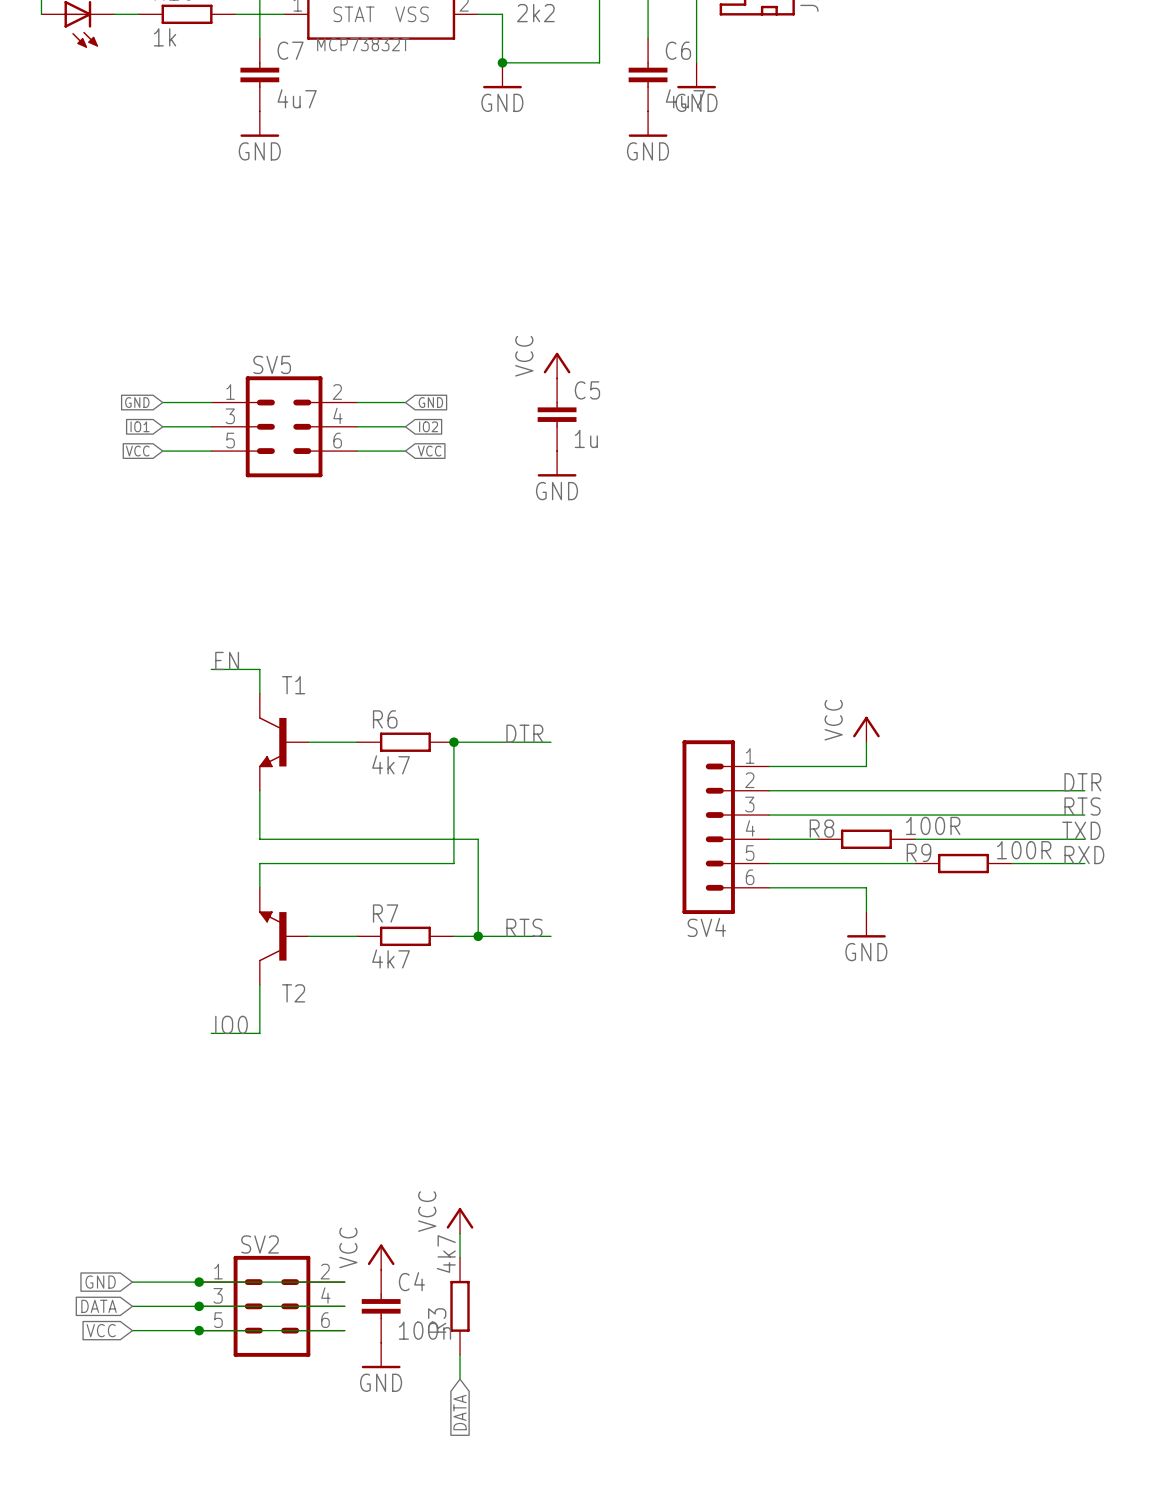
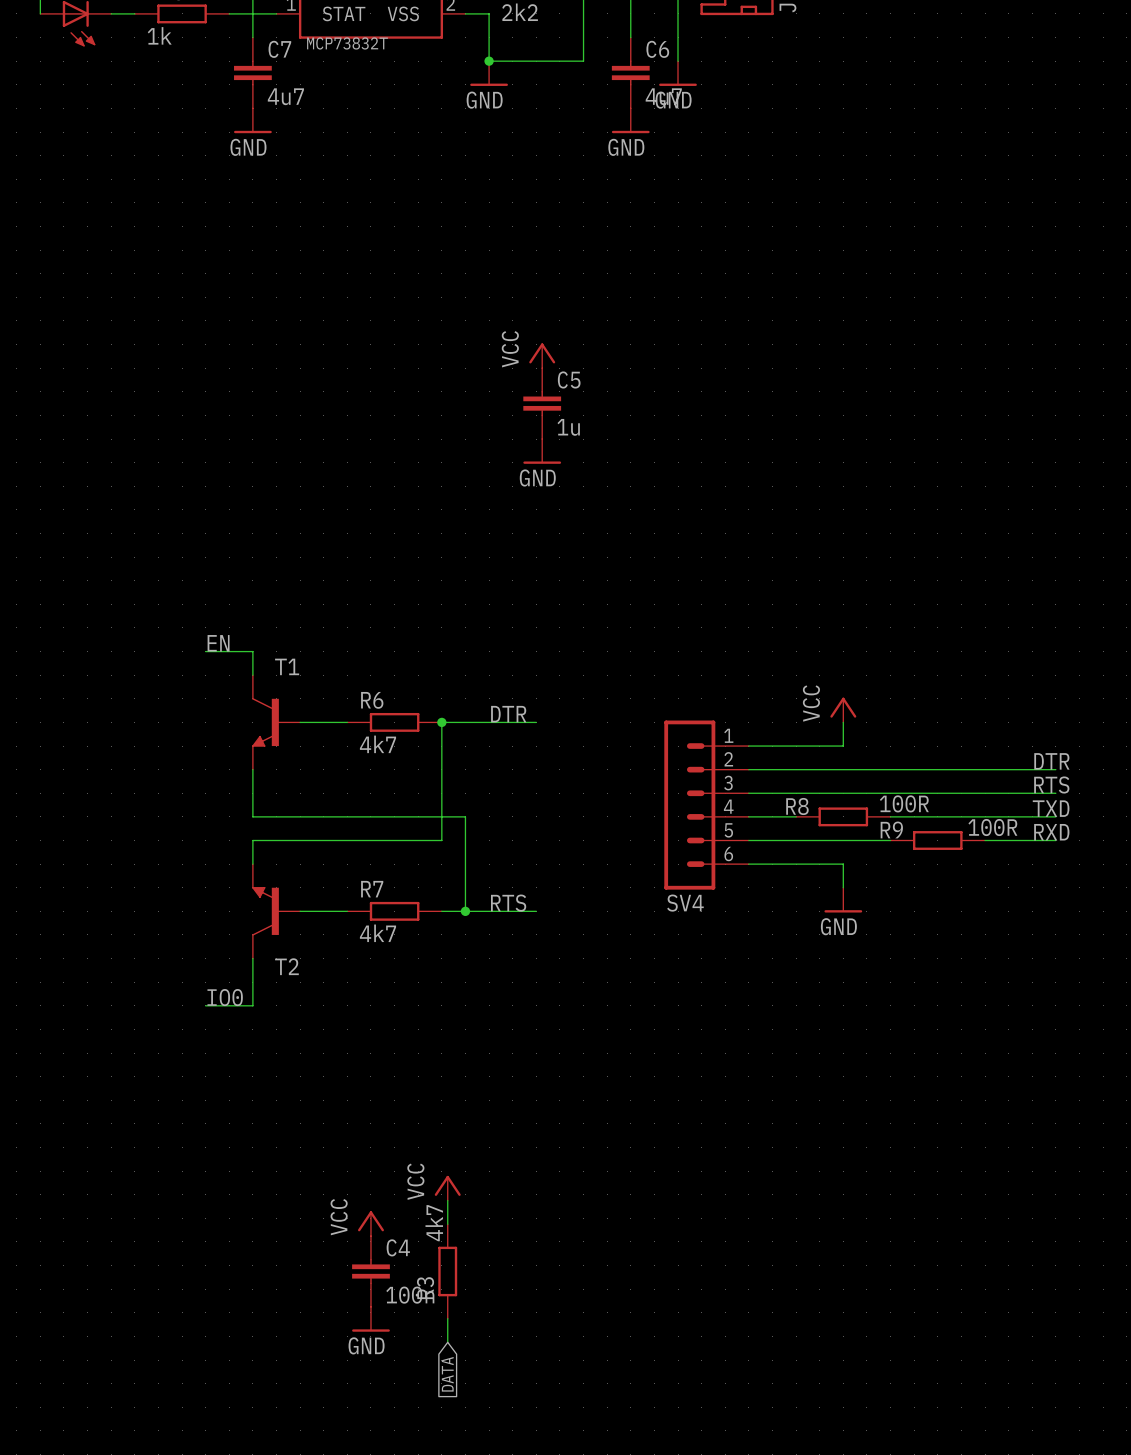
global label: GND (137, 402) -> none
wire: (162, 402) (211, 402) -> none
wire: (356, 402) (405, 402) -> none
global label: GND (430, 402) -> none
global label: IO1 (140, 426) -> none
wire: (162, 426) (211, 426) -> none
SV5: (284, 426) -> none
wire: (356, 426) (405, 426) -> none
global label: IO2 (428, 426) -> none
global label: VCC (137, 451) -> none
wire: (162, 451) (211, 451) -> none
wire: (356, 451) (405, 451) -> none
global label: VCC (429, 451) -> none
global label: GND (100, 1282) -> none
wire: (132, 1282) (344, 1282) -> none
junction: (199, 1282) -> none
global label: DATA (99, 1306) -> none
wire: (132, 1306) (344, 1306) -> none
junction: (199, 1306) -> none
SV2: (271, 1306) -> none
global label: VCC (101, 1330) -> none
wire: (132, 1330) (344, 1330) -> none
junction: (199, 1330) -> none

